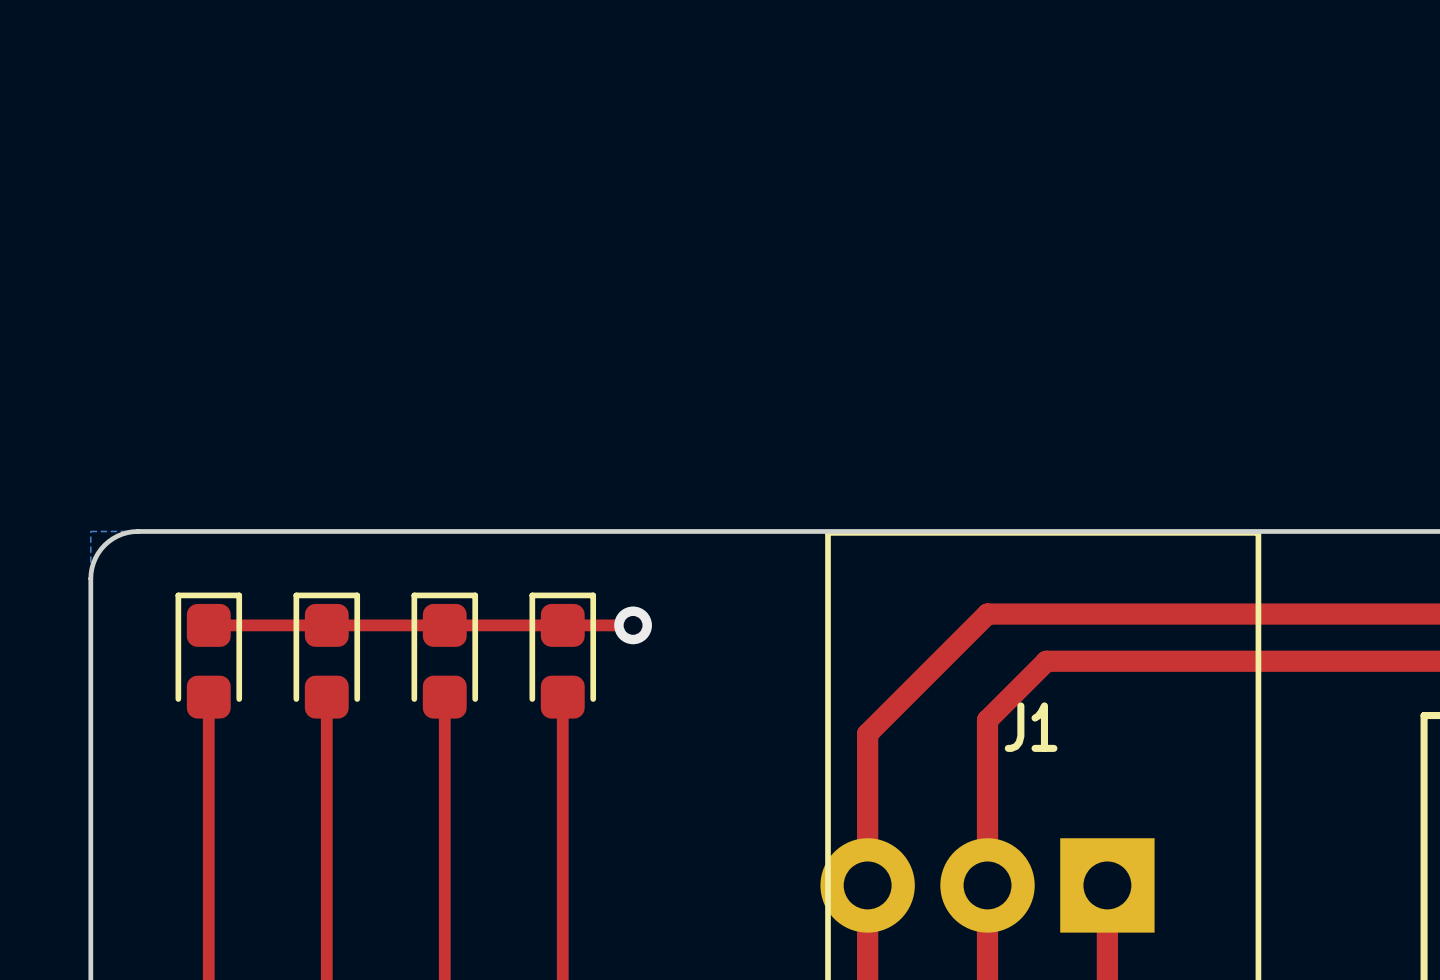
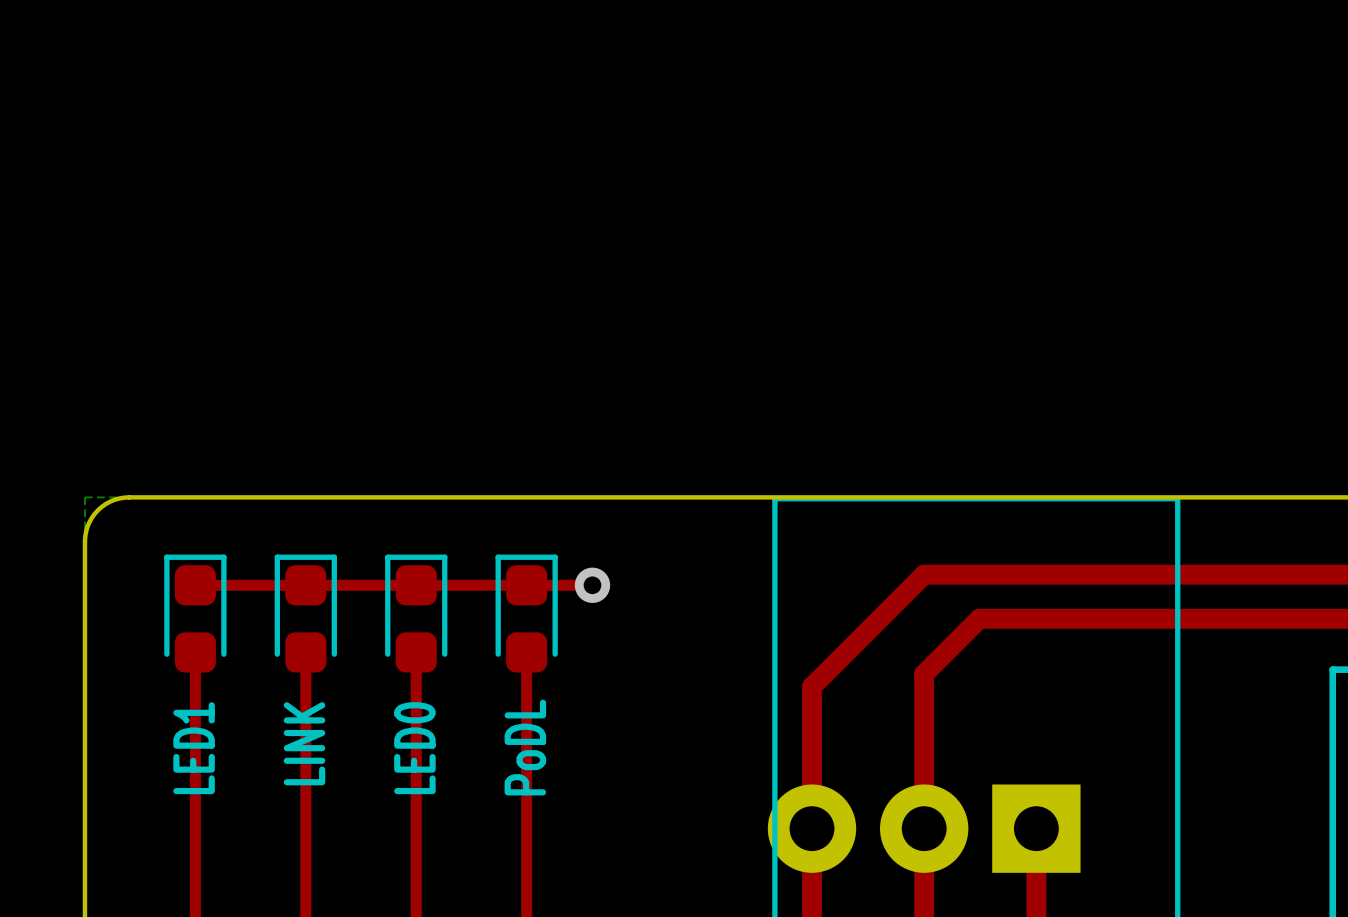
J1 name: J1 (1031, 727) -> none
text: none -> LINK (304, 743)
text: none -> PoDL (525, 747)
text: none -> LED1 (194, 748)
text: none -> LED0 (414, 748)

